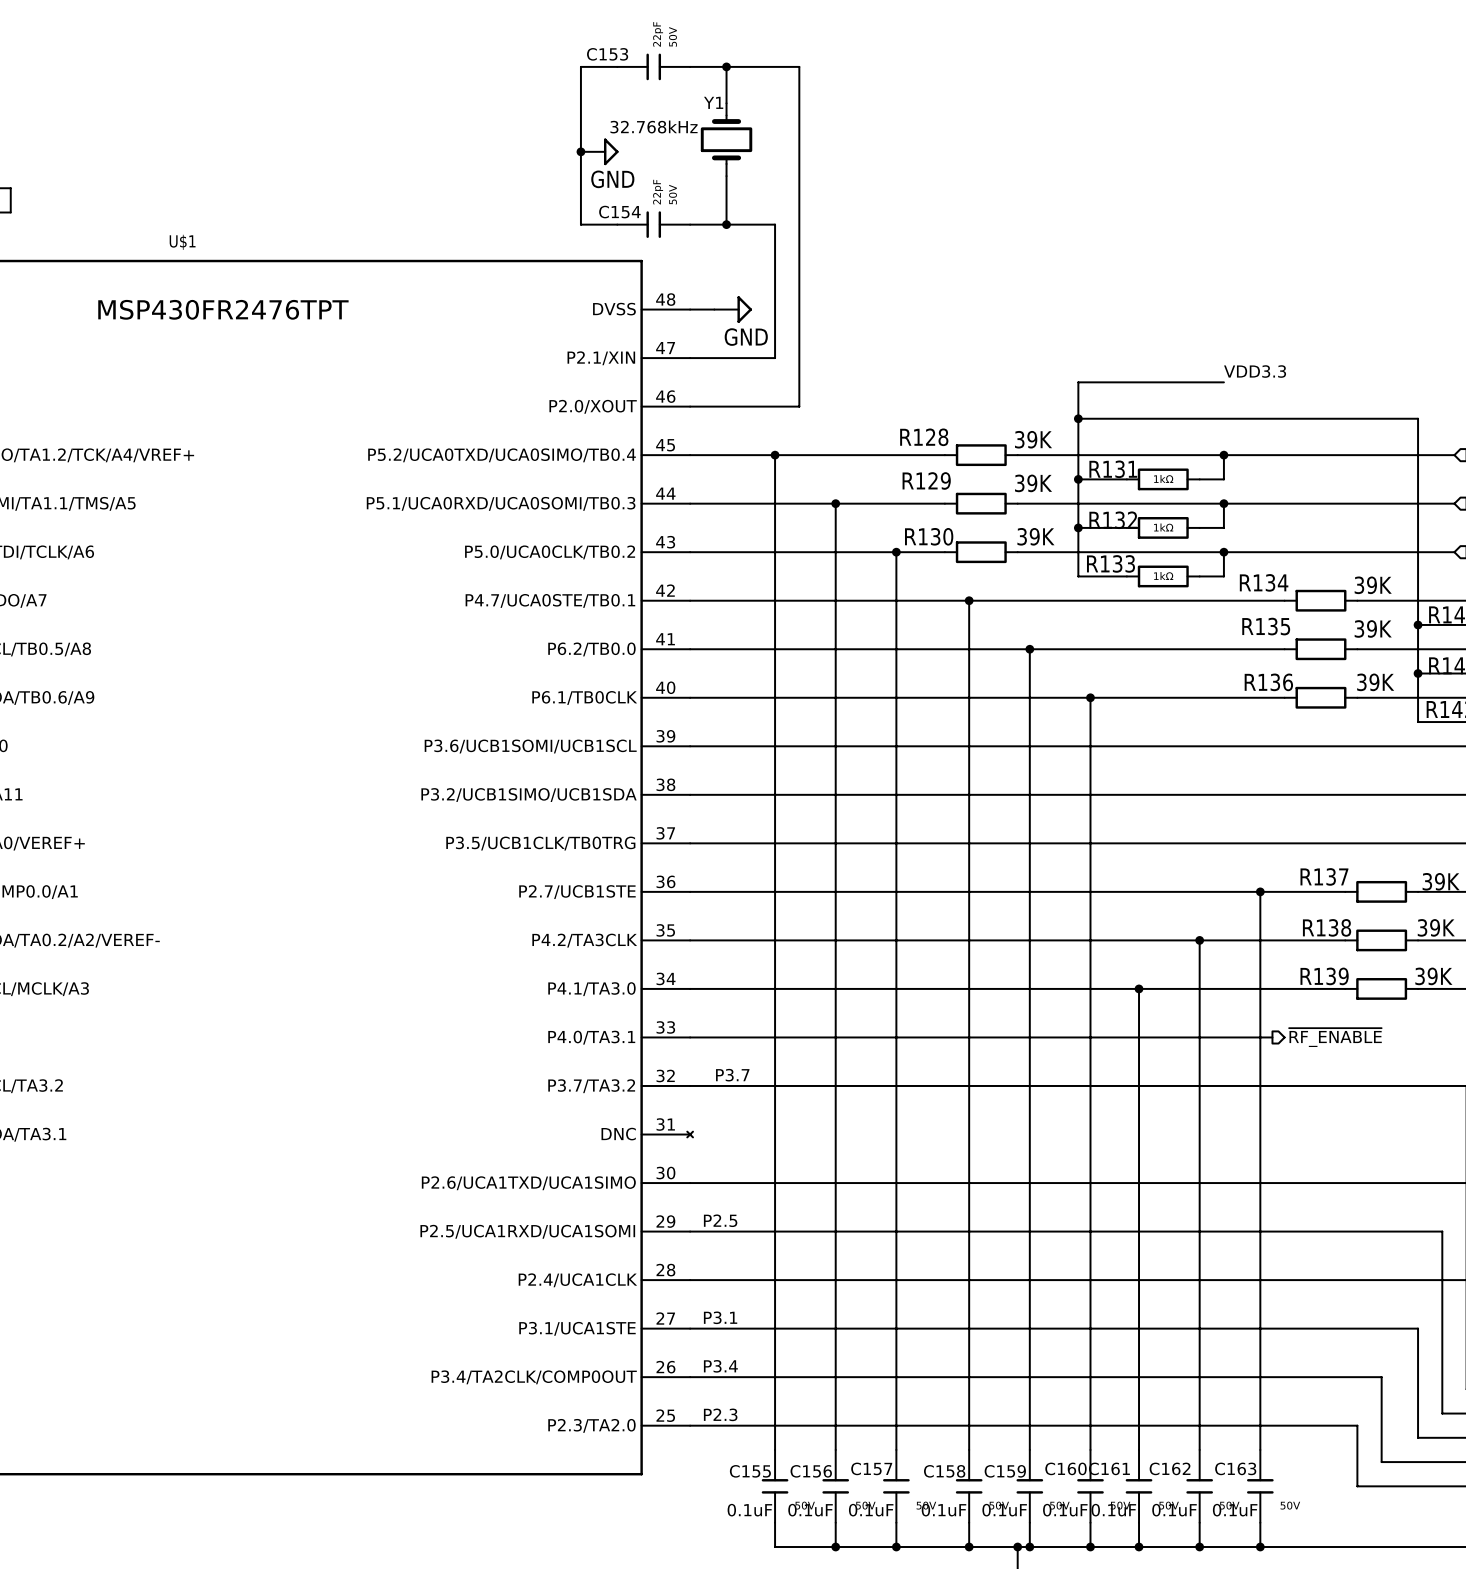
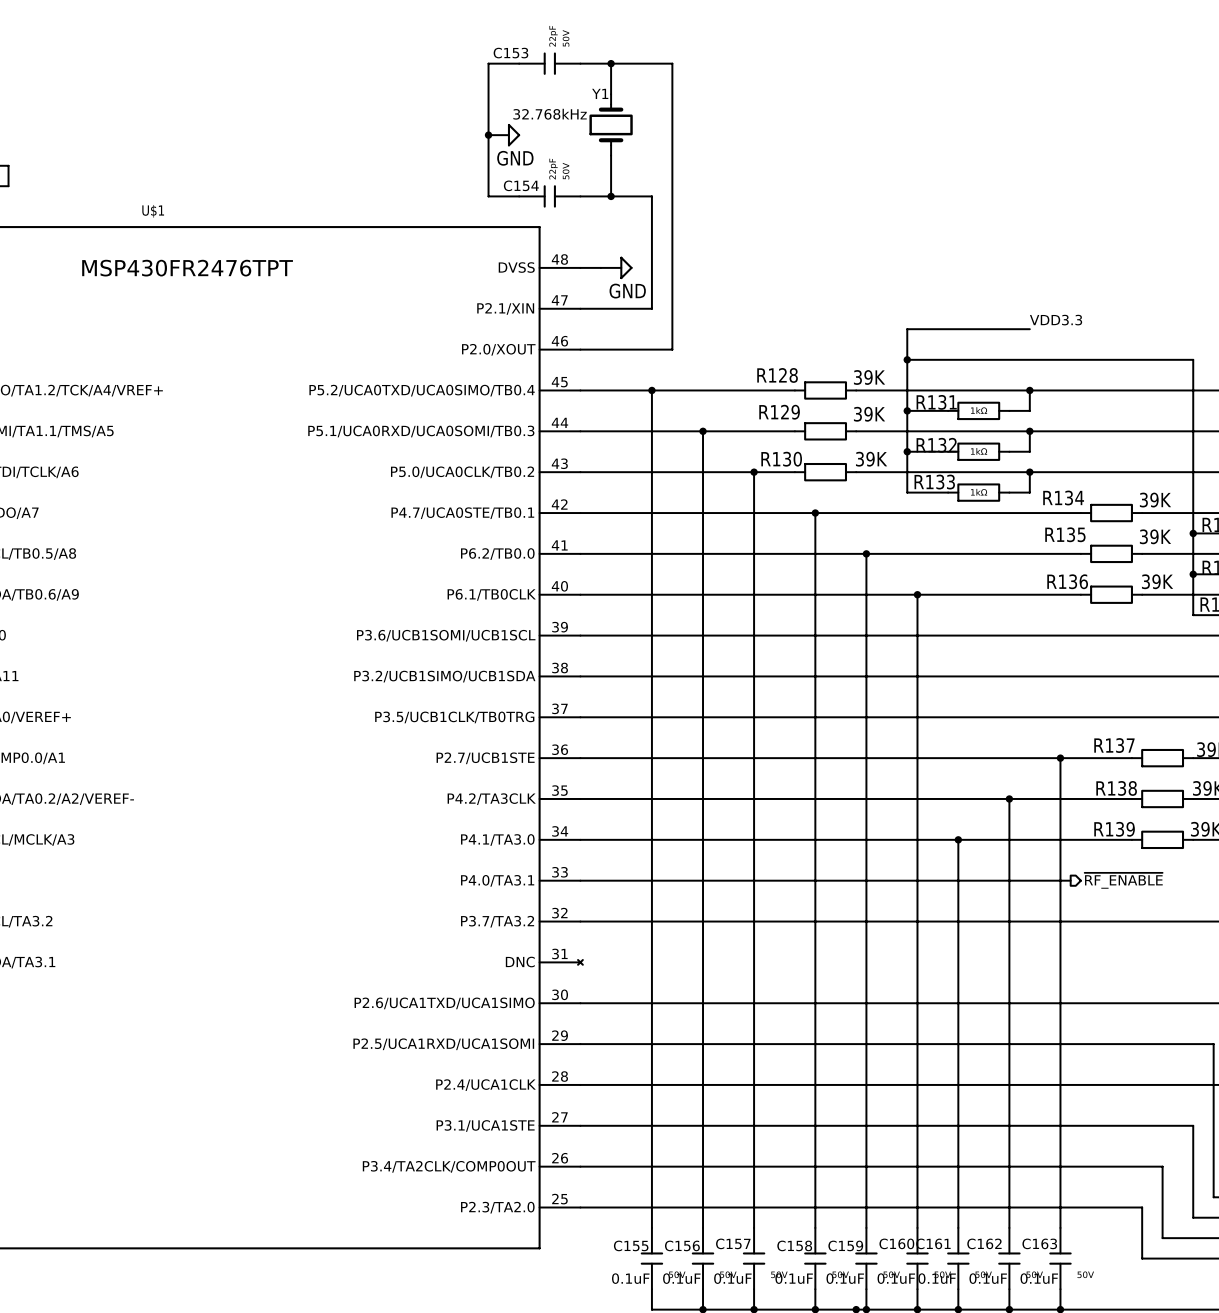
label: P3.7 (732, 1075) -> none
label: P2.5 (720, 1220) -> none
label: P3.1 (720, 1317) -> none
label: P3.4 (720, 1366) -> none
label: P2.3 (720, 1414) -> none

